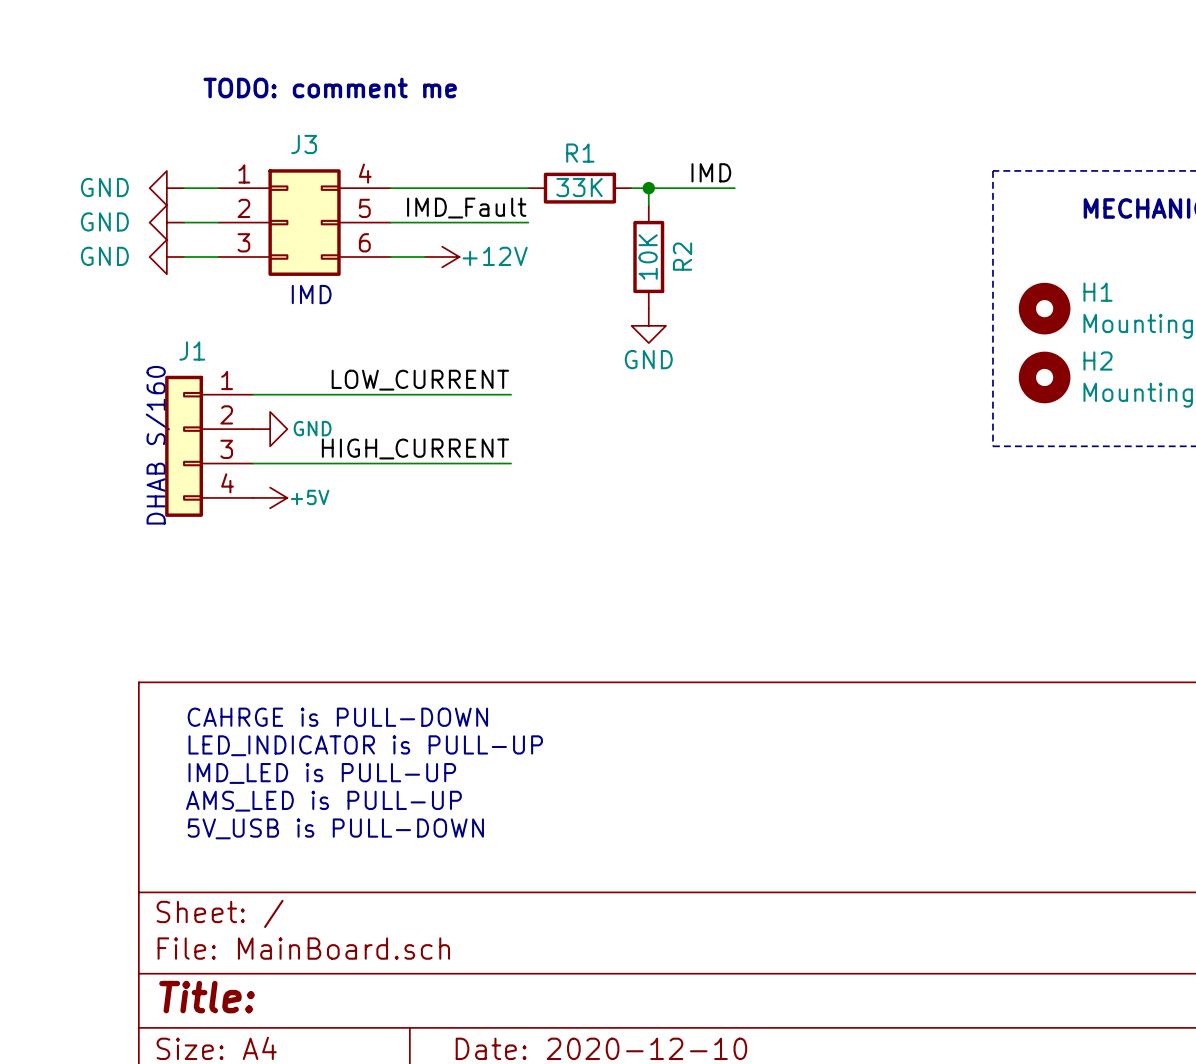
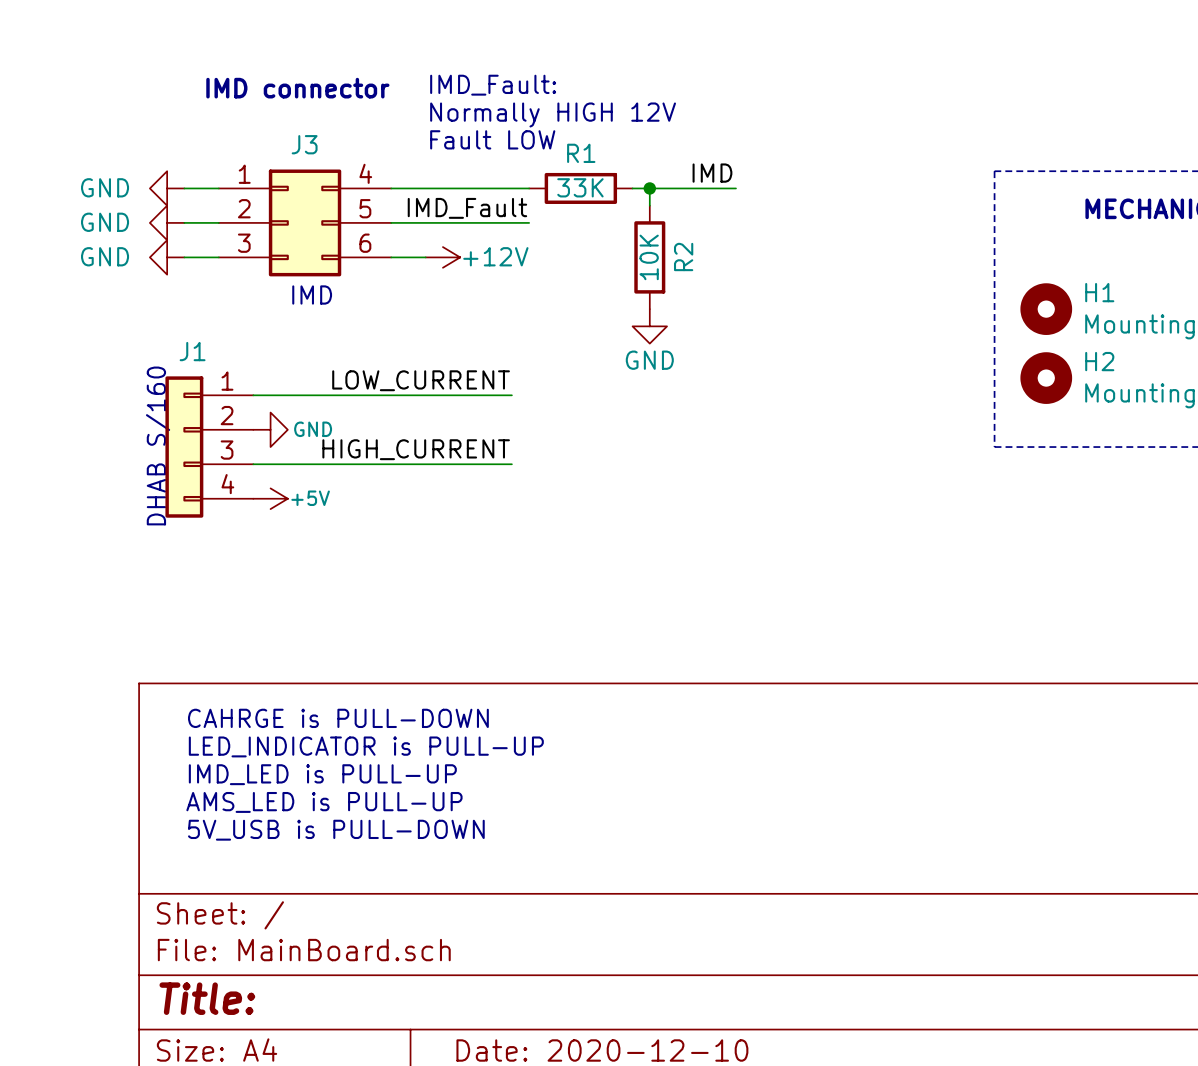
text: none -> IMD_Fault: (493, 85)
text: TODO: comment me (330, 88) -> IMD connector (297, 88)
text: none -> Normally HIGH 12V (553, 114)
text: none -> Fault LOW (492, 139)

